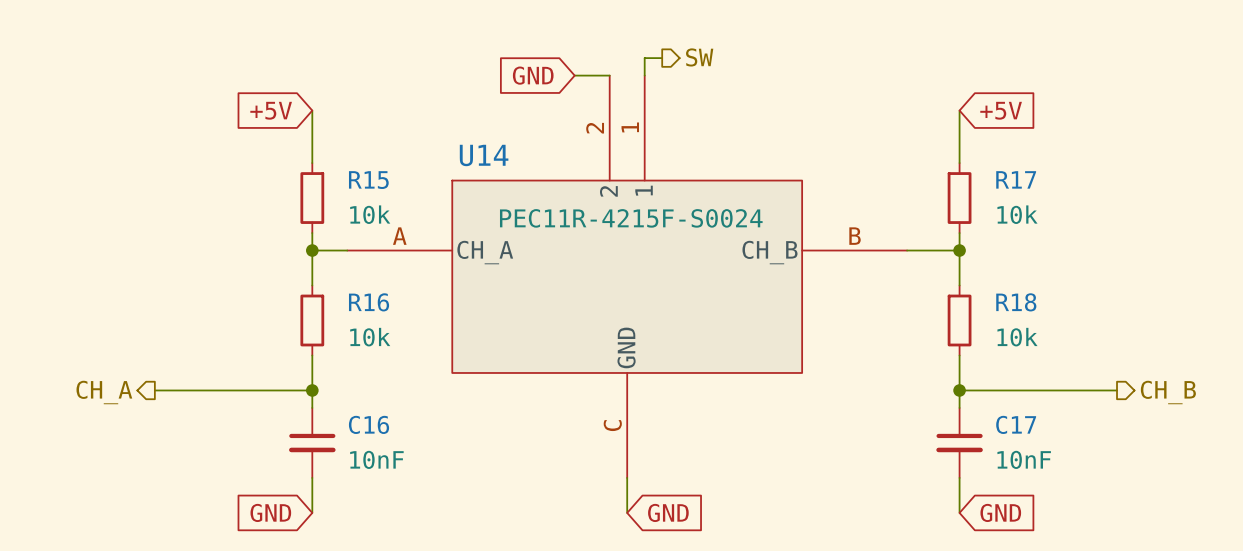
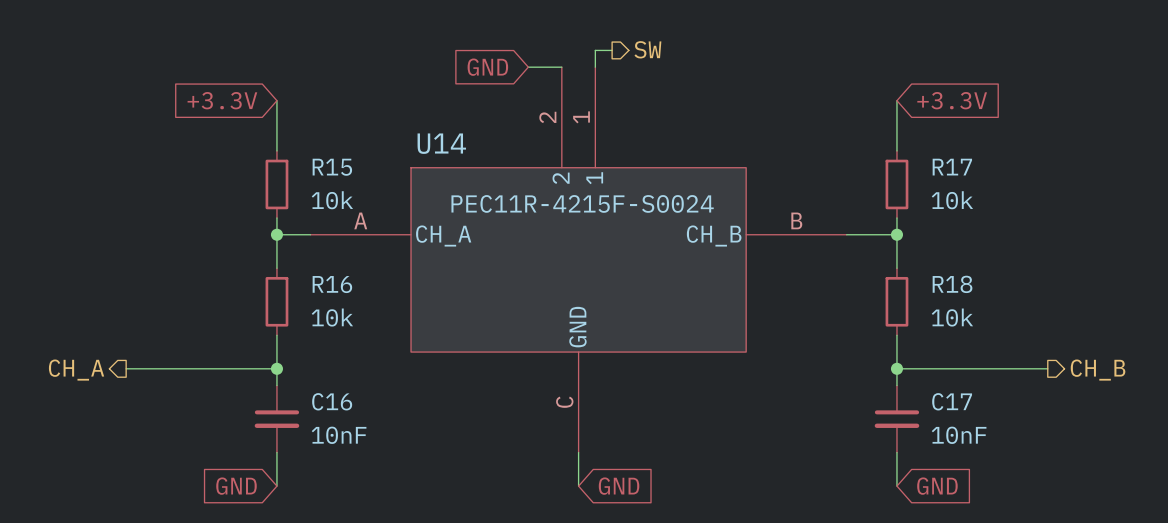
global label: +5V (271, 110) -> +3.3V (222, 100)
global label: +5V (1001, 110) -> +3.3V (952, 100)

